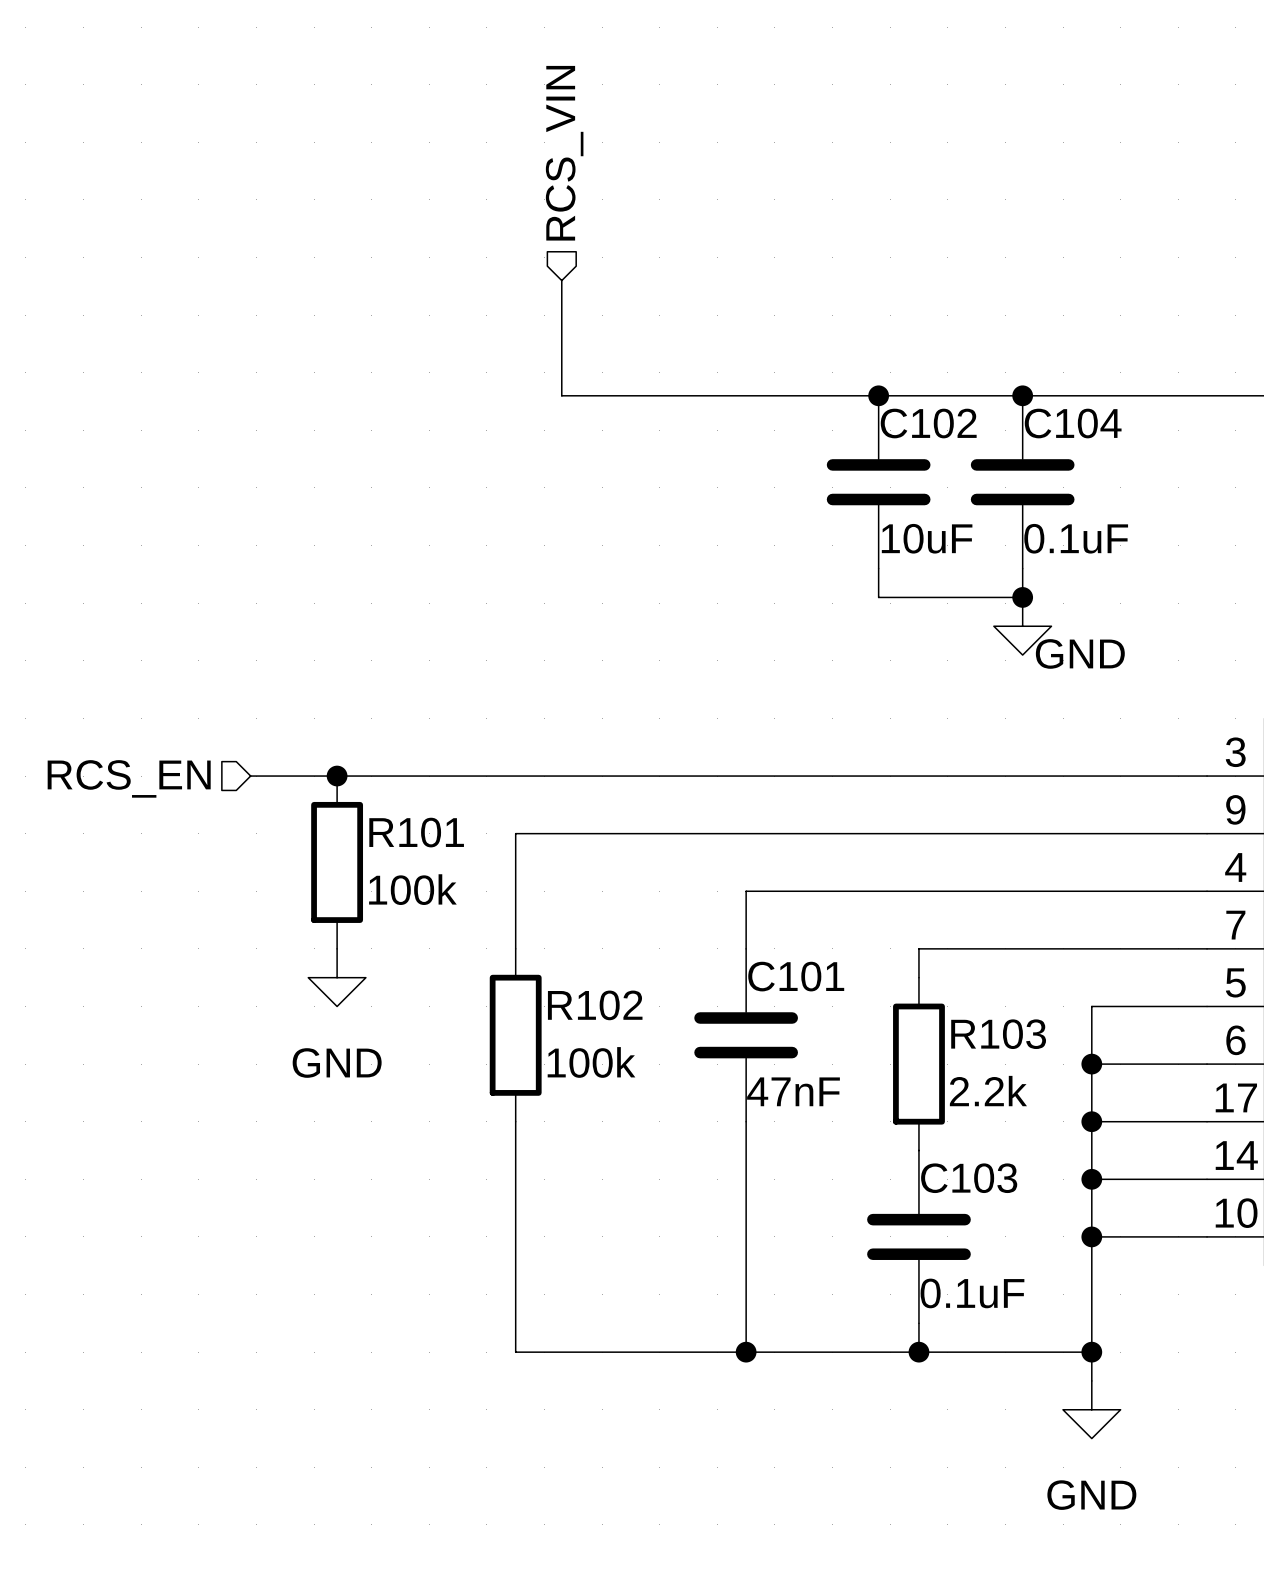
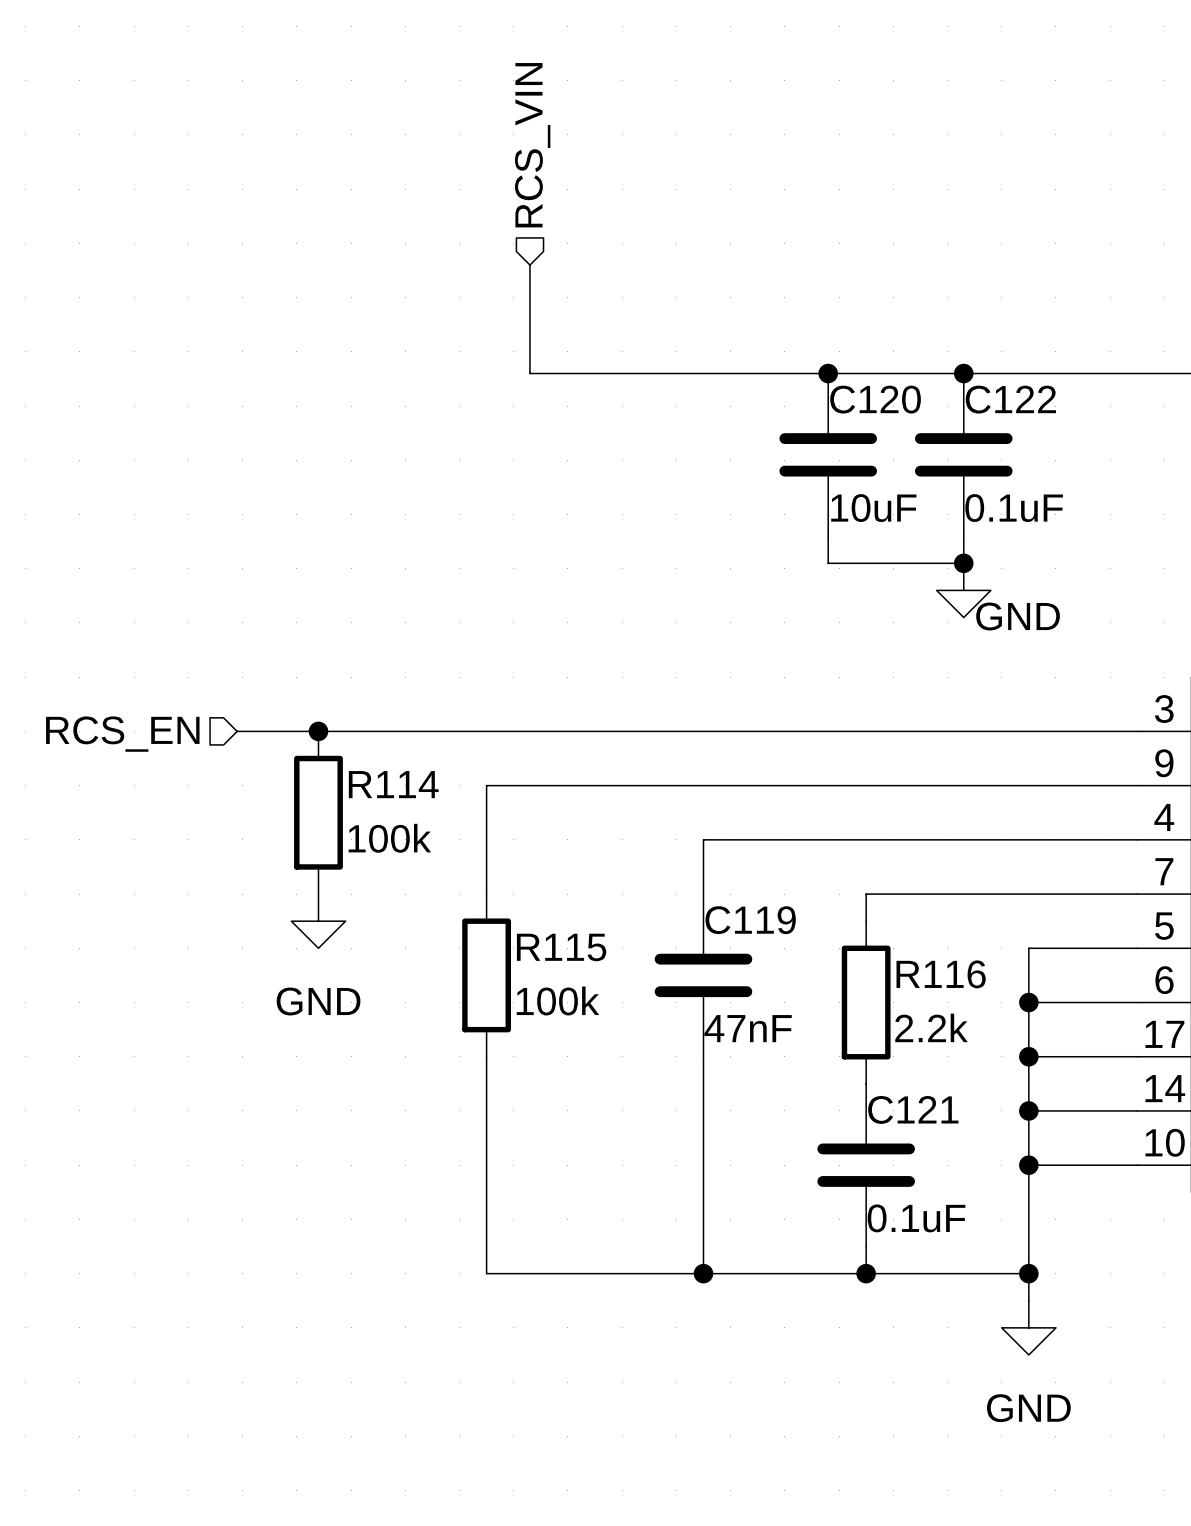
C102 name: C102 (928, 423) -> C120 (875, 399)
C104 name: C104 (1073, 423) -> C122 (1010, 399)
R101 name: R101 (416, 832) -> R114 (393, 784)
C101 name: C101 (796, 976) -> C119 (750, 920)
R102 name: R102 (595, 1005) -> R115 (561, 947)
R103 name: R103 (998, 1034) -> R116 (941, 974)
C103 name: C103 (969, 1178) -> C121 (913, 1109)

